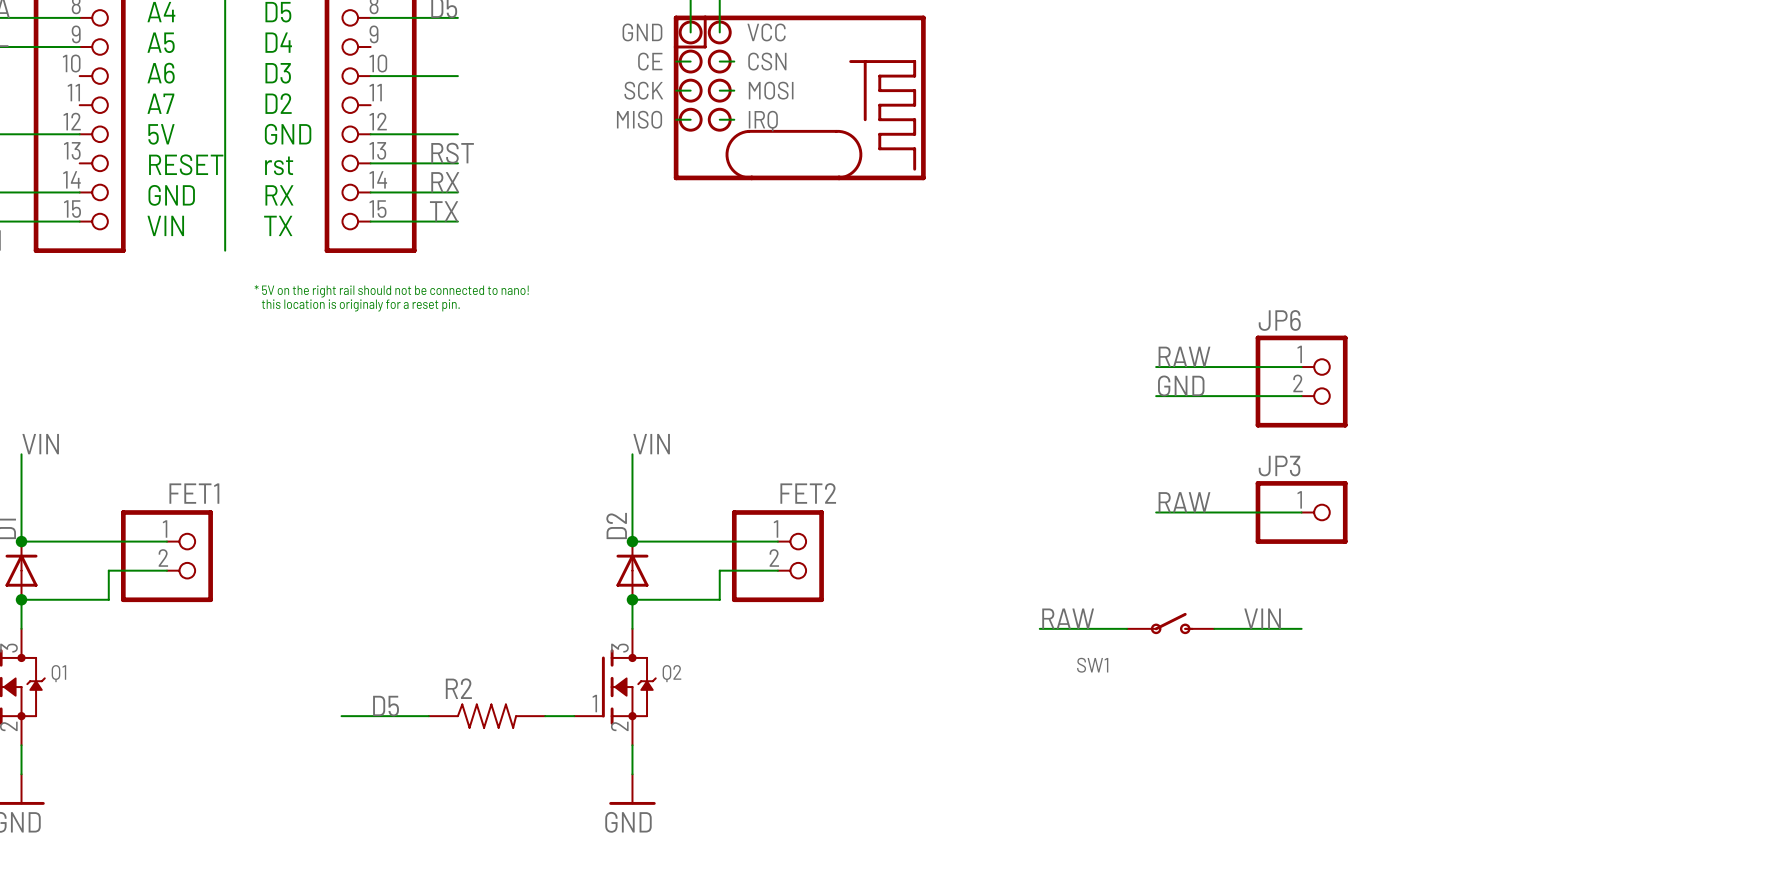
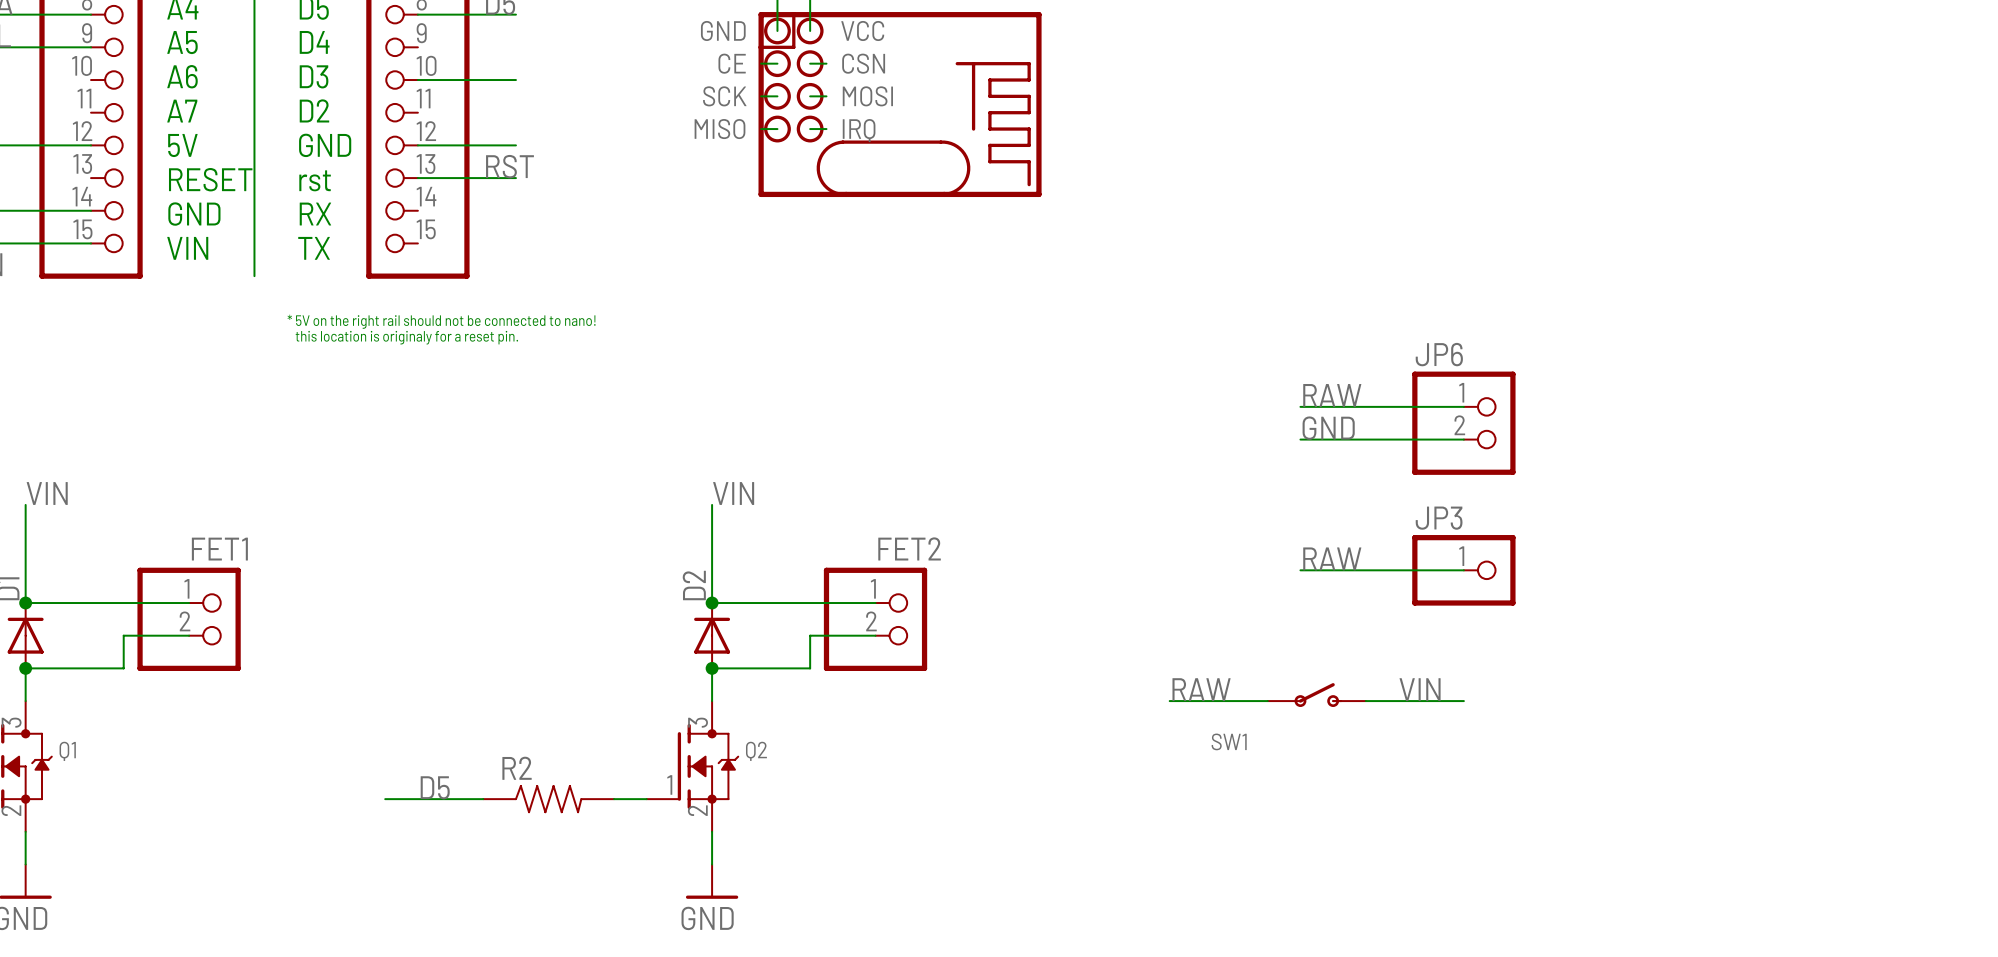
label: RX (445, 182) -> none
wire: (370, 192) (457, 192) -> none
label: TX (444, 211) -> none
wire: (370, 221) (457, 221) -> none

